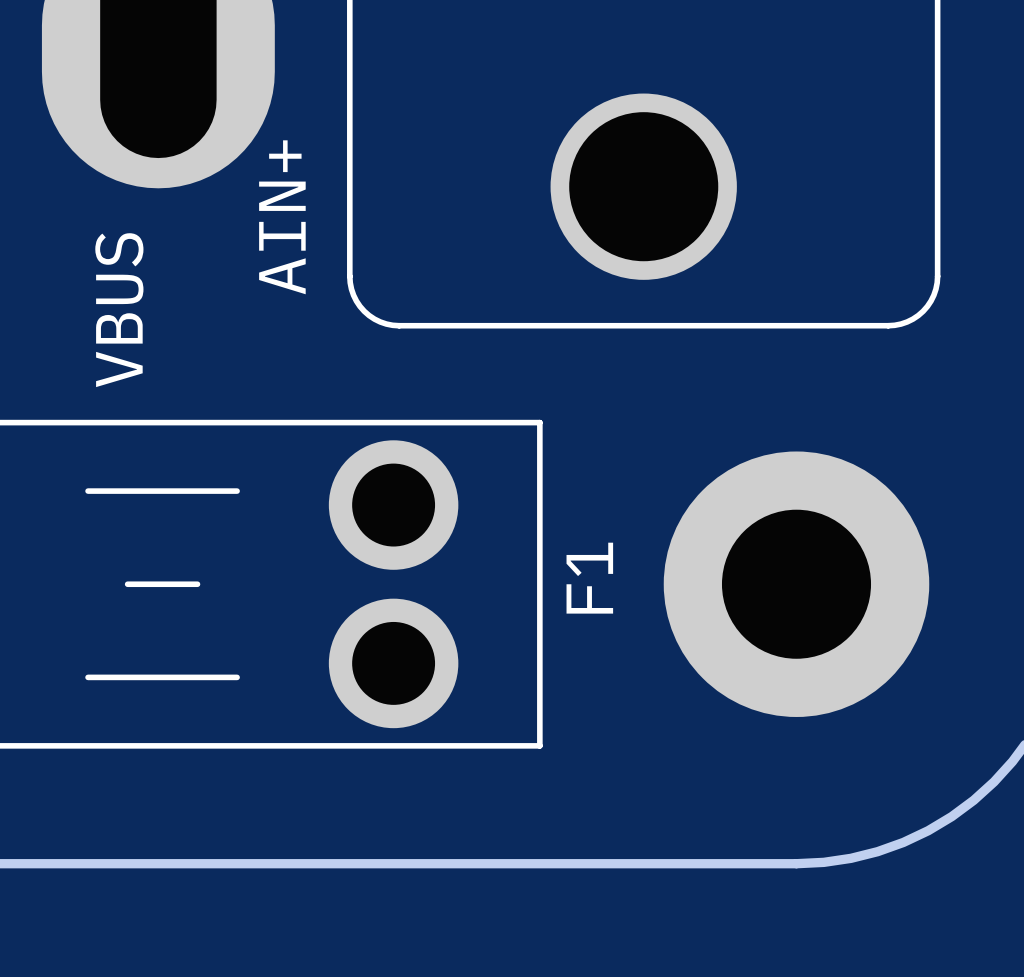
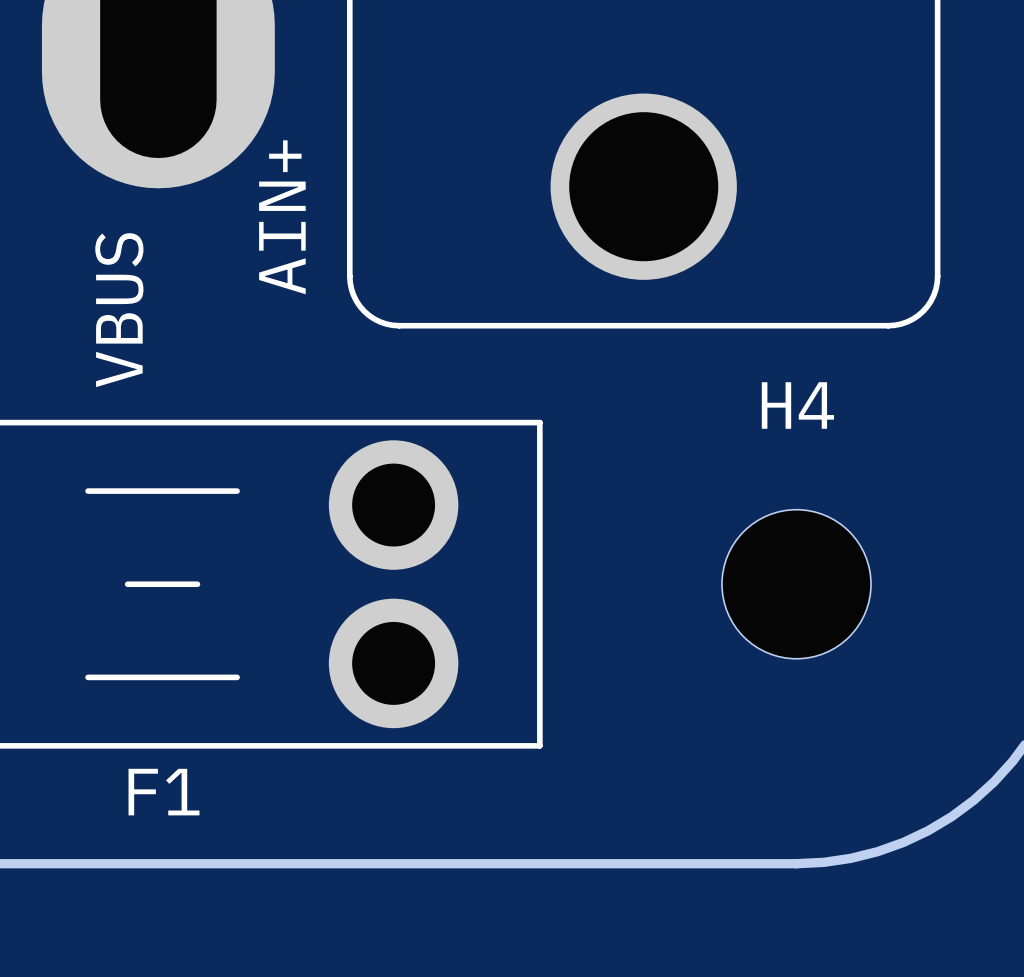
F1 name rotation: 0° (589, 578) -> 90° clockwise (164, 792)
F1 name position: F1 (589, 578) -> F1 (164, 792)
part: (796, 584) -> none
H4: none -> (796, 584)

